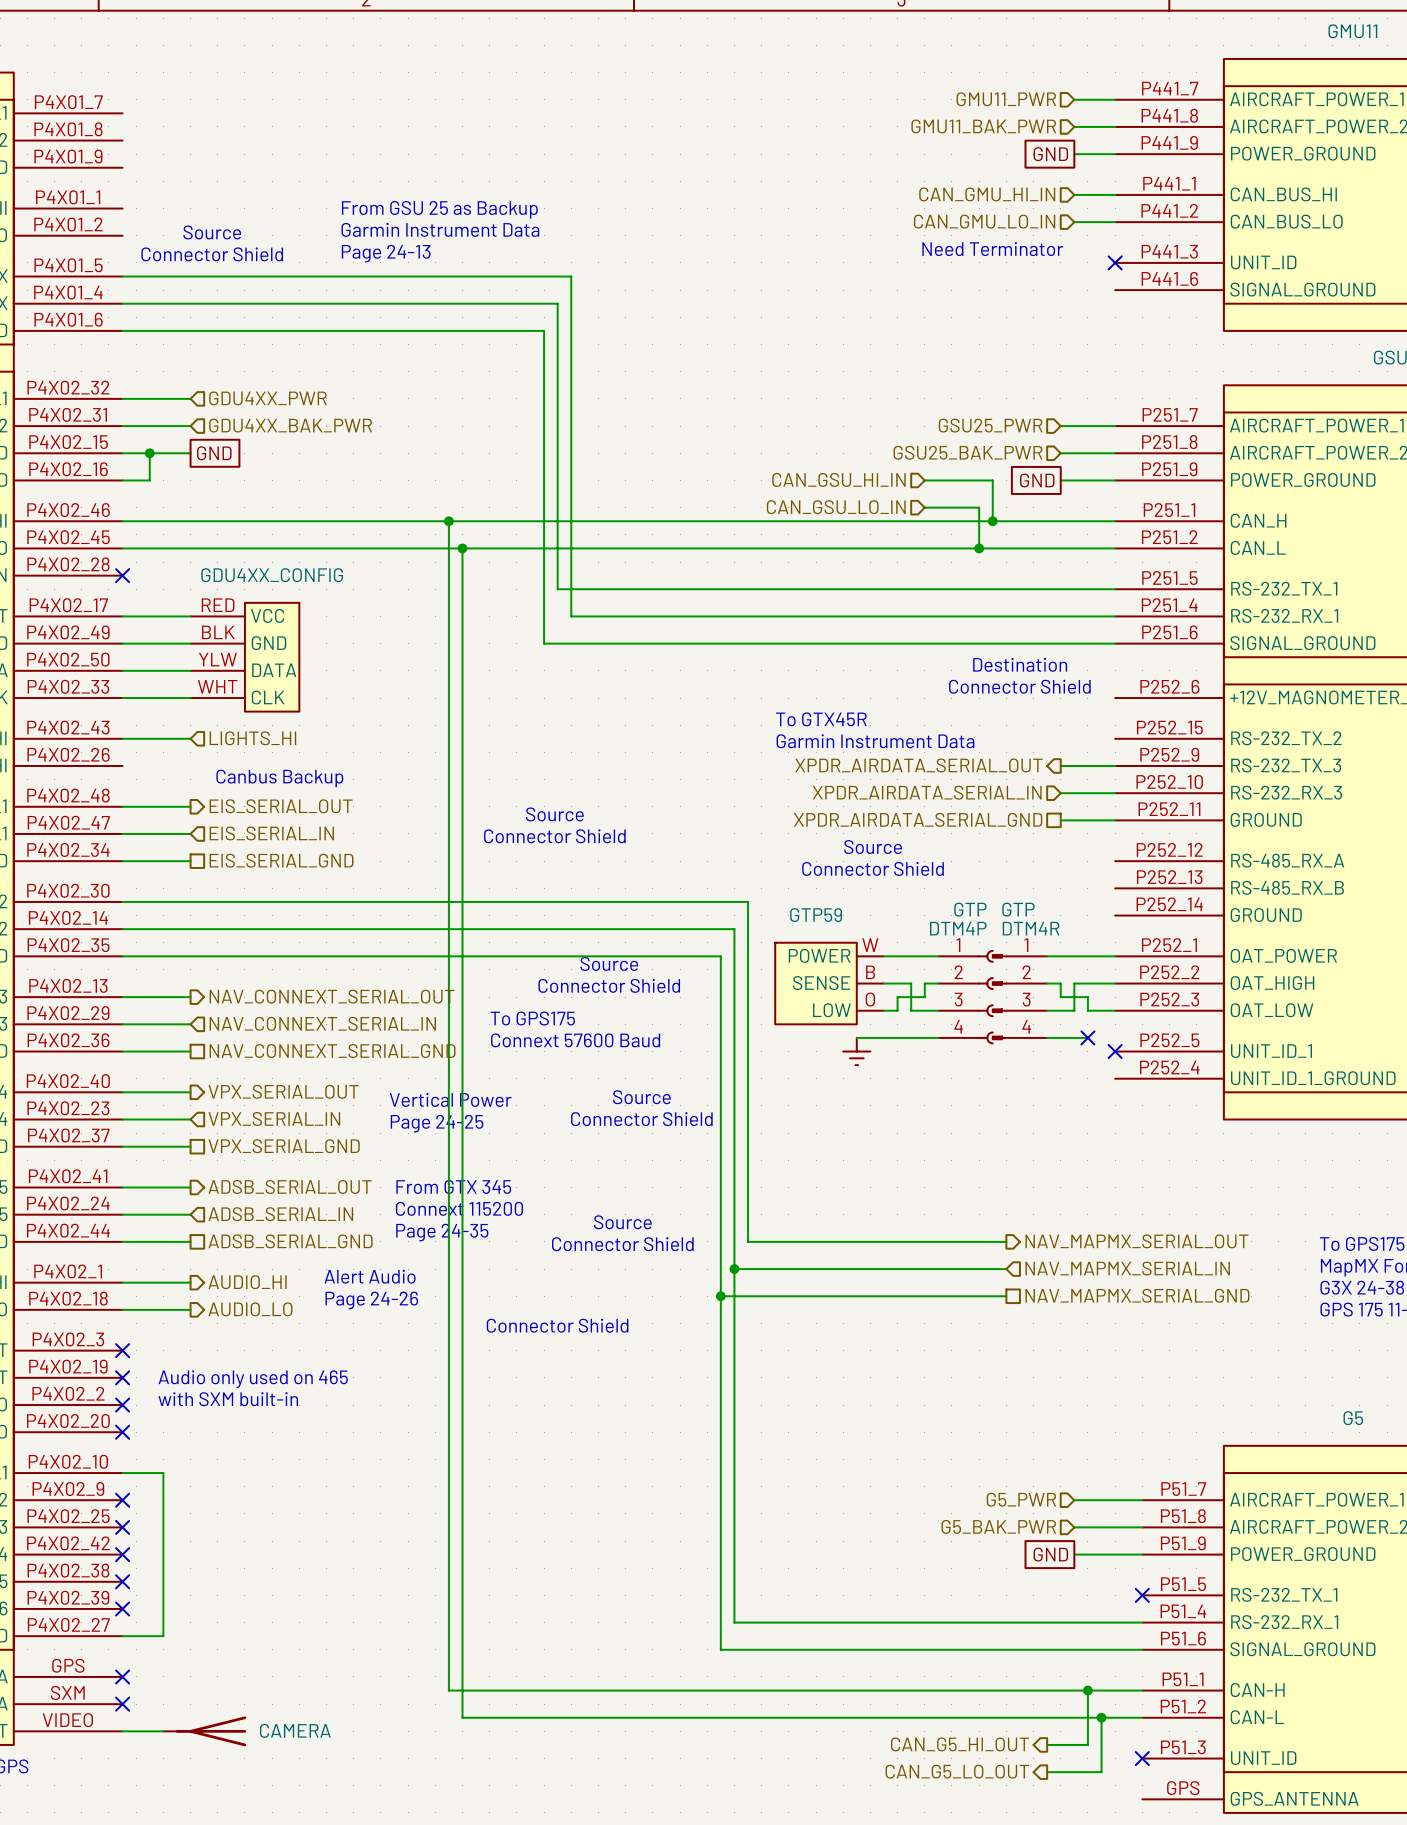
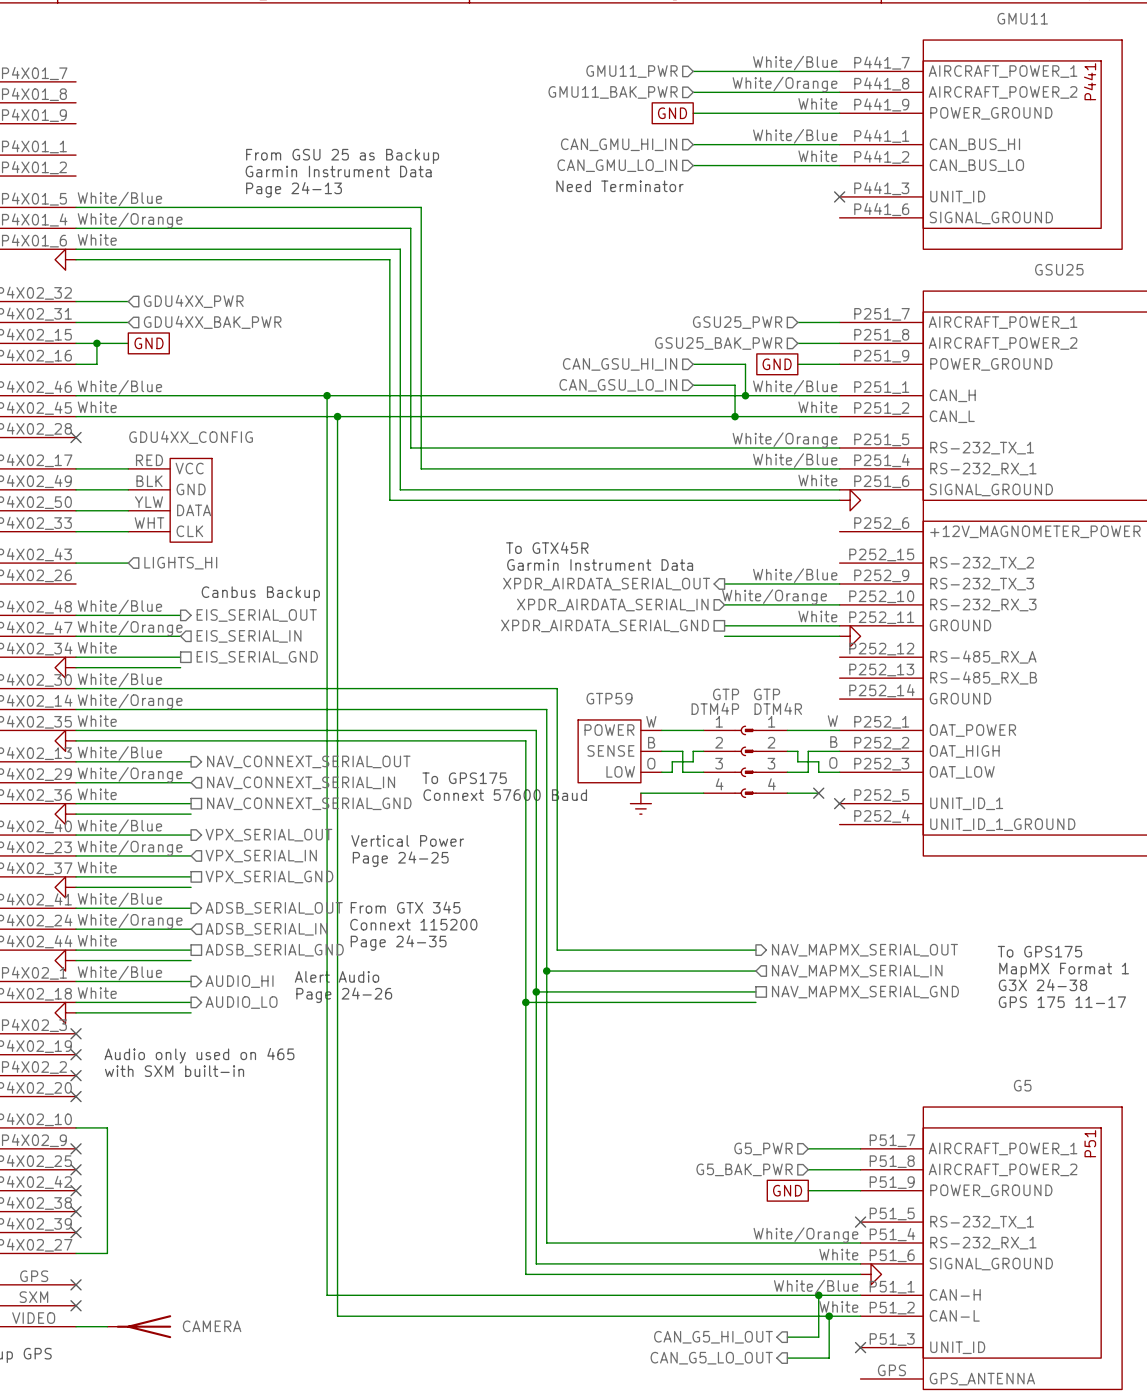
label: none -> White/Blue (795, 63)
wire: none -> (693, 71) (808, 71)
hierarchical label position: GMU11_PWR (1006, 99) -> GMU11_PWR (632, 71)
label: none -> White/Orange (785, 84)
wire: none -> (693, 92) (808, 92)
hierarchical label position: GMU11_BAK_PWR (983, 126) -> GMU11_BAK_PWR (613, 92)
label: none -> White (817, 103)
wire: none -> (693, 113) (808, 113)
global label position: GND (1050, 154) -> GND (672, 113)
label: none -> White/Blue (795, 136)
wire: none -> (693, 144) (808, 144)
hierarchical label position: CAN_GMU_HI_IN (987, 194) -> CAN_GMU_HI_IN (619, 144)
label: none -> White (817, 156)
hierarchical label position: CAN_GMU_LO_IN (984, 221) -> CAN_GMU_LO_IN (617, 165)
wire: none -> (693, 165) (808, 165)
text: Source (212, 232) -> none
text position: Need Terminator (992, 249) -> Need Terminator (619, 186)
text: Connector Shield (212, 254) -> none
label: none -> White/Blue (119, 199)
label: none -> White/Orange (130, 220)
label: none -> White (97, 239)
power symbol: none -> (65, 259)
wire: none -> (76, 259) (389, 259) (389, 500) (839, 500)
label: none -> White/Blue (119, 387)
label: none -> White/Blue (795, 387)
label: none -> White (97, 407)
label: none -> White (817, 407)
label: none -> White/Orange (785, 440)
label: none -> White/Blue (795, 460)
label: none -> White (817, 480)
power symbol: none -> (850, 500)
text: Destination (1020, 664) -> none
text: Connector Shield (1019, 686) -> none
text position: To GTX45R (821, 719) -> To GTX45R (547, 547)
text position: Garmin Instrument Data (875, 741) -> Garmin Instrument Data (600, 564)
label: none -> White/Blue (795, 575)
hierarchical label position: XPDR_AIRDATA_SERIAL_OUT (918, 765) -> XPDR_AIRDATA_SERIAL_OUT (606, 584)
wire: none -> (724, 583) (797, 583)
text position: Canbus Backup (279, 778) -> Canbus Backup (260, 593)
label: none -> White/Orange (774, 597)
hierarchical label position: XPDR_AIRDATA_SERIAL_IN (927, 792) -> XPDR_AIRDATA_SERIAL_IN (612, 605)
wire: none -> (724, 604) (797, 604)
label: none -> White/Blue (119, 607)
wire: none -> (128, 615) (180, 615)
hierarchical label position: EIS_SERIAL_OUT (281, 806) -> EIS_SERIAL_OUT (256, 615)
label: none -> White (817, 616)
text: Source (554, 814) -> none
hierarchical label position: XPDR_AIRDATA_SERIAL_GND (918, 819) -> XPDR_AIRDATA_SERIAL_GND (605, 625)
wire: none -> (724, 625) (797, 625)
label: none -> White/Orange (130, 628)
wire: none -> (128, 636) (180, 636)
hierarchical label position: EIS_SERIAL_IN (271, 833) -> EIS_SERIAL_IN (249, 636)
wire: none -> (724, 636) (839, 636)
power symbol: none -> (850, 636)
text: Connector Shield (554, 836) -> none
text: Source (873, 847) -> none
label: none -> White (97, 647)
hierarchical label position: EIS_SERIAL_GND (281, 860) -> EIS_SERIAL_GND (257, 657)
wire: none -> (128, 657) (180, 657)
text: Connector Shield (873, 868) -> none
power symbol: none -> (65, 667)
wire: none -> (76, 667) (180, 667)
label: none -> White/Blue (119, 680)
label: none -> White/Orange (130, 701)
label: none -> White (97, 721)
label: none -> W (832, 721)
text: Source (609, 963) -> none
power symbol: none -> (65, 740)
wire: none -> (76, 740) (525, 740) (525, 1274) (860, 1274)
label: none -> B (833, 742)
label: none -> White/Blue (119, 753)
text: Connector Shield (609, 985) -> none
hierarchical label position: NAV_CONNEXT_SERIAL_OUT (332, 996) -> NAV_CONNEXT_SERIAL_OUT (308, 761)
wire: none -> (128, 761) (191, 761)
label: none -> O (833, 762)
label: none -> White/Orange (130, 774)
text position: To GPS175 (532, 1018) -> To GPS175 (464, 778)
hierarchical label position: NAV_CONNEXT_SERIAL_IN (322, 1023) -> NAV_CONNEXT_SERIAL_IN (301, 782)
wire: none -> (128, 782) (191, 782)
label: none -> White (97, 794)
text position: Connext 57600 Baud (575, 1040) -> Connext 57600 Baud (505, 795)
wire: none -> (128, 803) (191, 803)
hierarchical label position: NAV_CONNEXT_SERIAL_GND (332, 1051) -> NAV_CONNEXT_SERIAL_GND (309, 803)
power symbol: none -> (65, 814)
wire: none -> (76, 814) (191, 814)
label: none -> White/Blue (119, 826)
hierarchical label position: VPX_SERIAL_OUT (283, 1091) -> VPX_SERIAL_OUT (268, 835)
wire: none -> (128, 835) (191, 835)
text: Source (641, 1097) -> none
text position: Vertical Power (450, 1099) -> Vertical Power (407, 840)
label: none -> White/Orange (130, 848)
wire: none -> (128, 855) (191, 855)
hierarchical label position: VPX_SERIAL_IN (274, 1119) -> VPX_SERIAL_IN (261, 856)
text: Connector Shield (641, 1119) -> none
text position: Page 24-25 (437, 1123) -> Page 24-25 (400, 859)
label: none -> White (97, 867)
wire: none -> (128, 876) (191, 876)
hierarchical label position: VPX_SERIAL_GND (284, 1146) -> VPX_SERIAL_GND (269, 876)
power symbol: none -> (65, 887)
wire: none -> (76, 887) (191, 887)
label: none -> White/Blue (119, 899)
hierarchical label position: ADSB_SERIAL_OUT (290, 1186) -> ADSB_SERIAL_OUT (274, 908)
text position: From GTX 345 (453, 1186) -> From GTX 345 (405, 907)
wire: none -> (128, 908) (191, 908)
label: none -> White/Orange (130, 921)
text position: Connext 115200 (459, 1208) -> Connext 115200 (413, 924)
wire: none -> (128, 929) (191, 929)
hierarchical label position: ADSB_SERIAL_IN (280, 1214) -> ADSB_SERIAL_IN (266, 929)
text: Source (622, 1222) -> none
label: none -> White (97, 940)
text position: Page 24-35 (442, 1232) -> Page 24-35 (398, 943)
wire: none -> (128, 950) (191, 950)
hierarchical label position: ADSB_SERIAL_GND (290, 1241) -> ADSB_SERIAL_GND (274, 950)
text: Connector Shield (622, 1244) -> none
power symbol: none -> (65, 960)
wire: none -> (76, 960) (191, 960)
label: none -> White/Blue (119, 973)
text position: Alert Audio (370, 1276) -> Alert Audio (337, 976)
wire: none -> (128, 981) (191, 981)
hierarchical label position: AUDIO_HI (247, 1282) -> AUDIO_HI (239, 981)
label: none -> White (97, 993)
text position: Page 24-26 (371, 1300) -> Page 24-26 (344, 995)
wire: none -> (128, 1002) (191, 1002)
hierarchical label position: AUDIO_LO (250, 1309) -> AUDIO_LO (241, 1002)
wire: none -> (525, 1002) (755, 1002)
junction: none -> (525, 1002)
power symbol: none -> (65, 1012)
wire: none -> (76, 1012) (191, 1012)
text: Connector Shield (557, 1325) -> none
label: none -> White/Orange (805, 1235)
label: none -> White (838, 1254)
power symbol: none -> (871, 1274)
label: none -> White/Blue (816, 1286)
label: none -> White (838, 1306)

